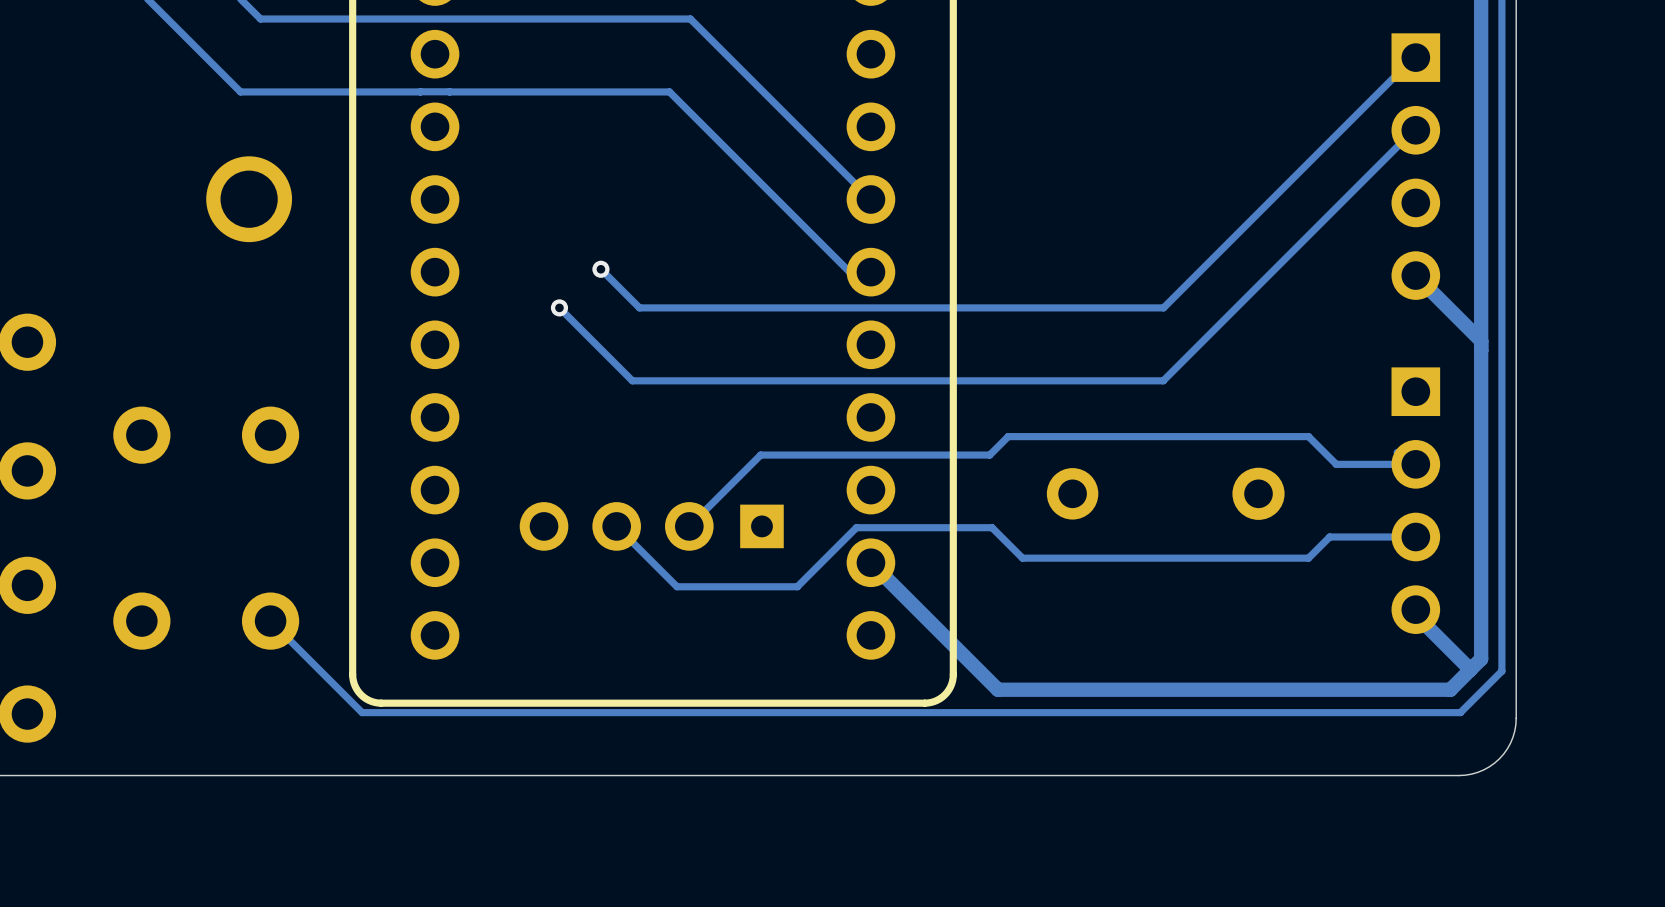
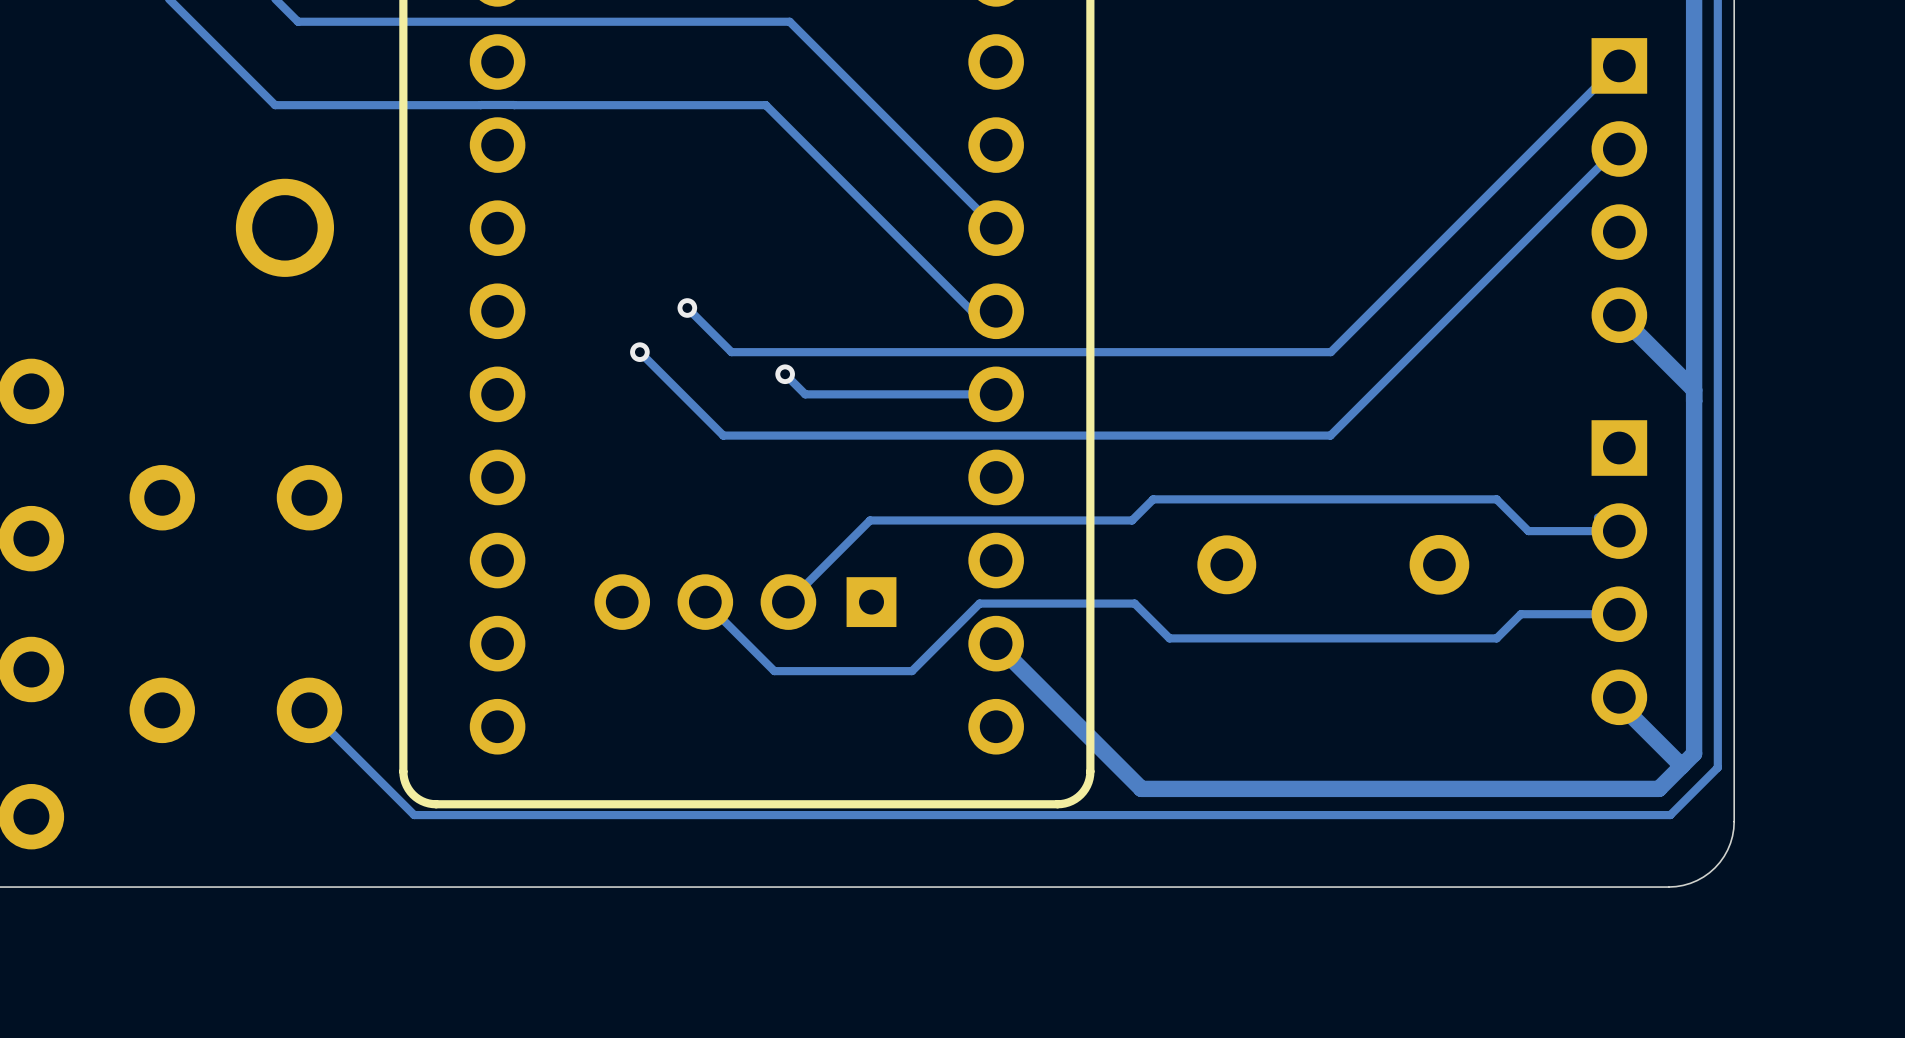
track: none -> (785, 374) (805, 394) (996, 394)
via: none -> (785, 374)

